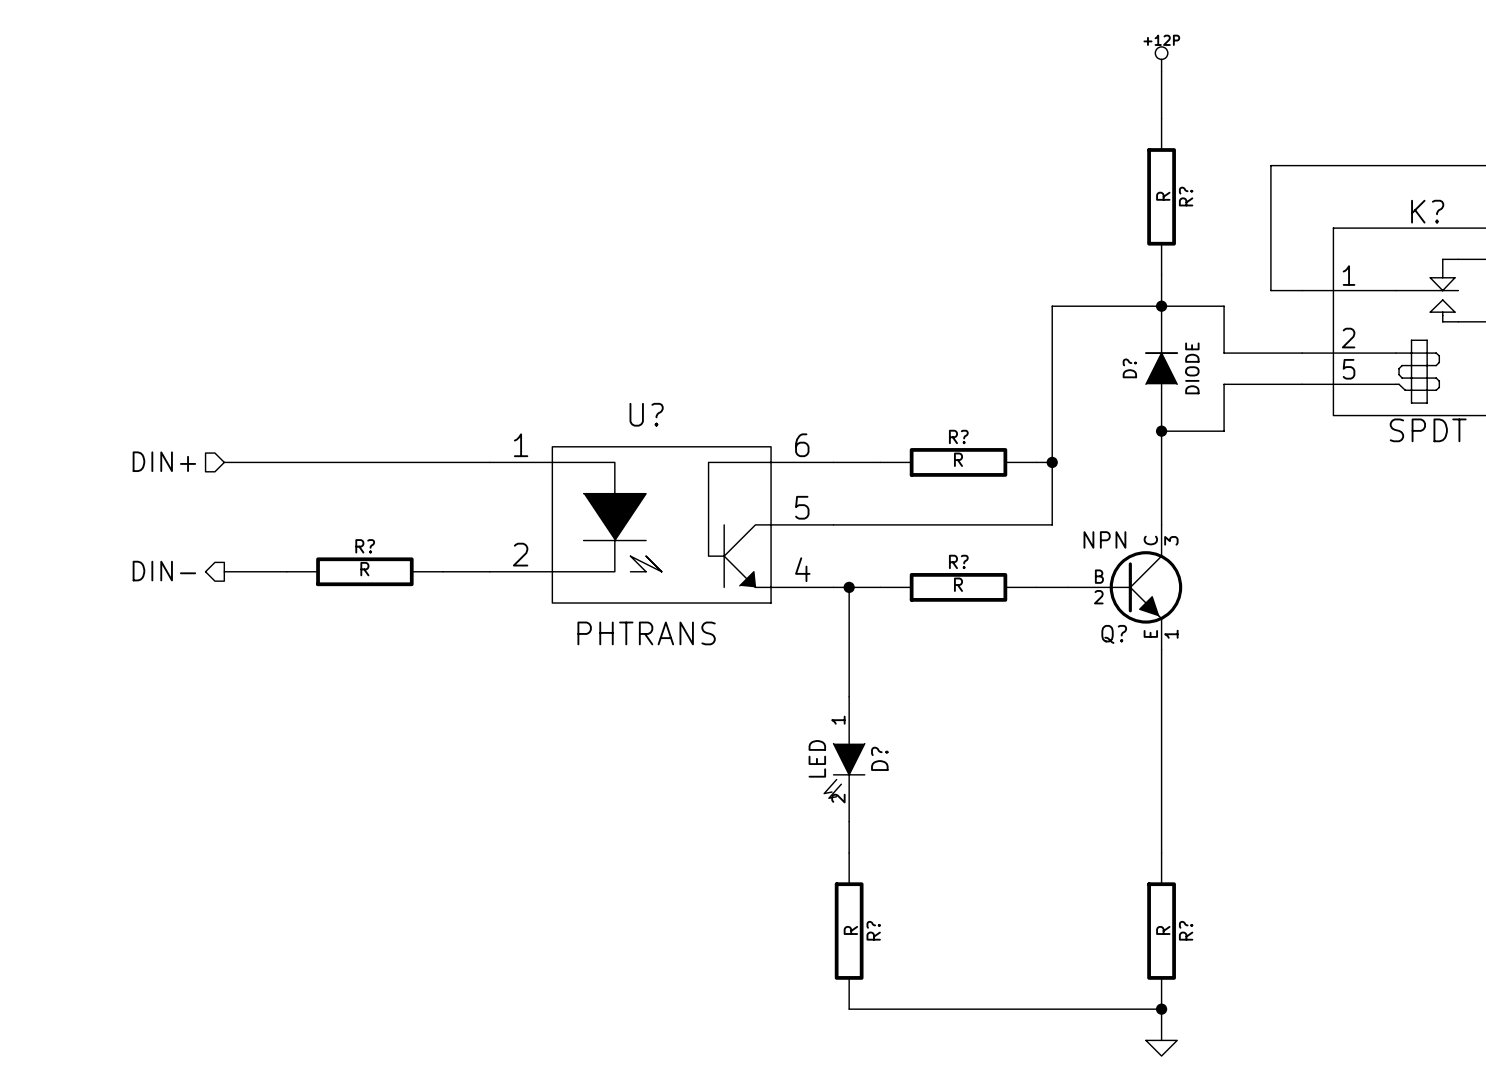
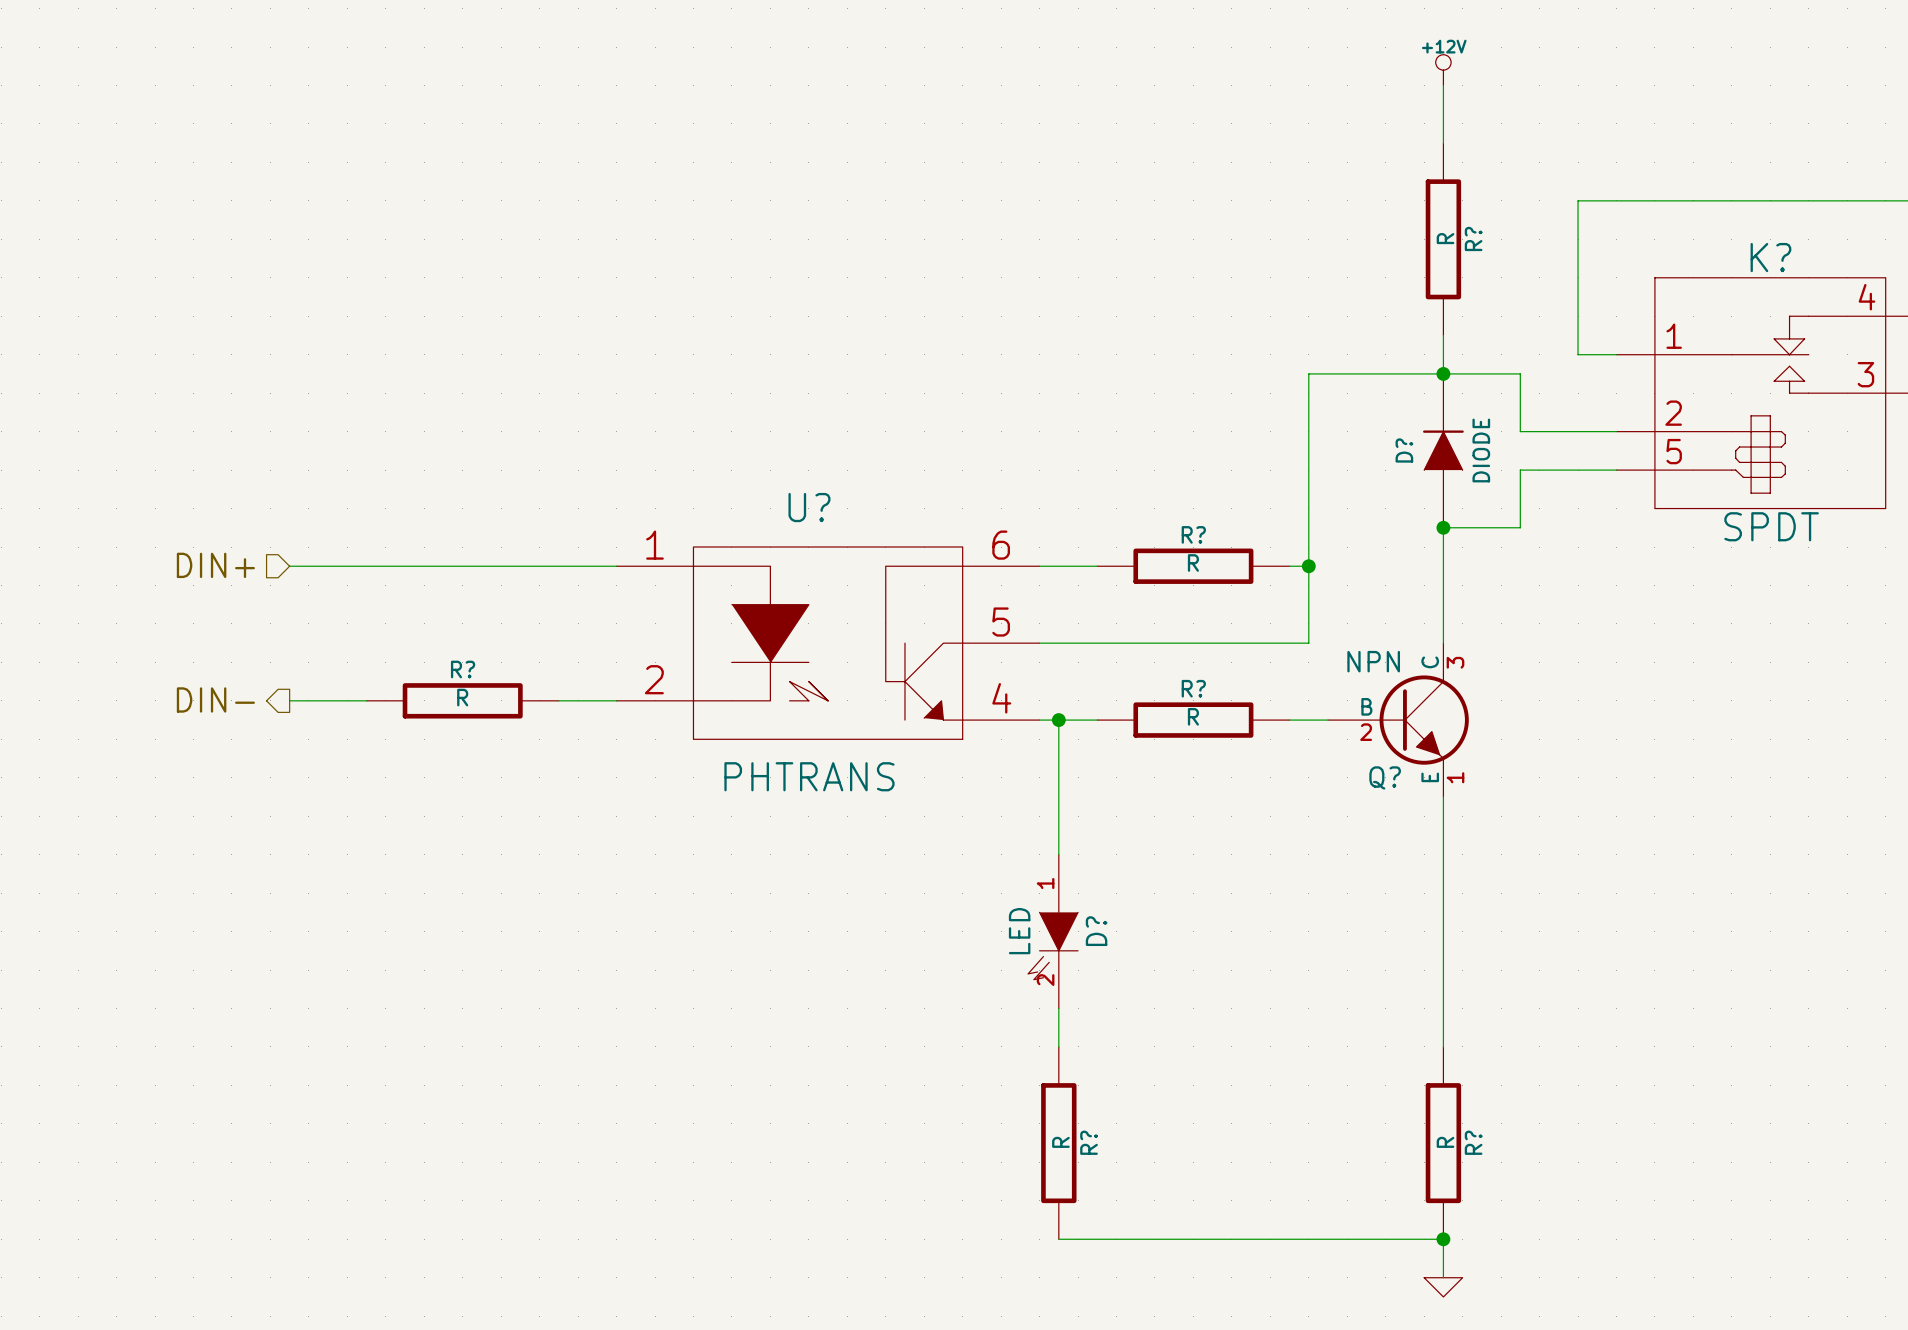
power symbol: +12P (1161, 59) -> +12V (1443, 70)

